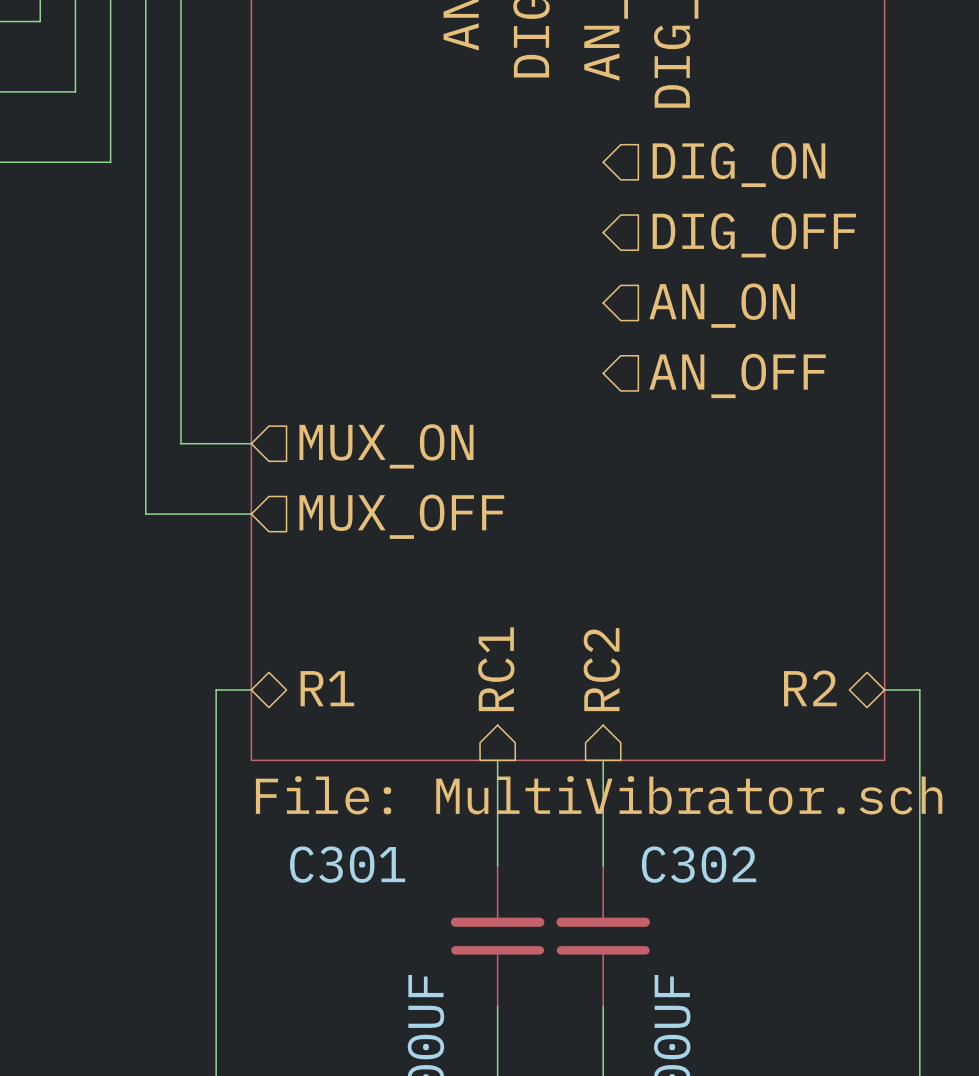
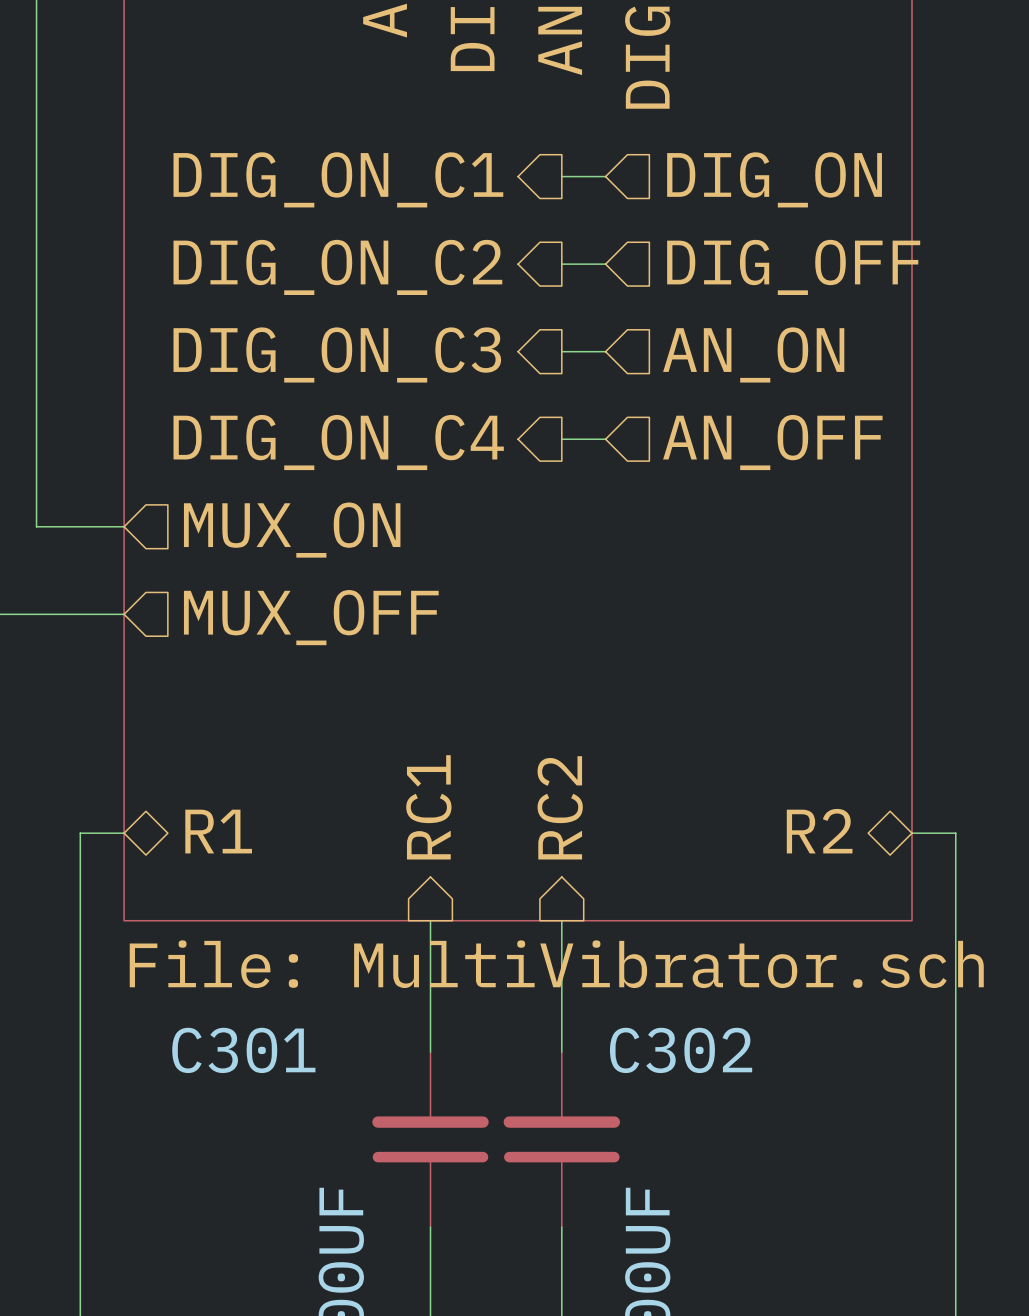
wire: none -> (561, 176) (605, 176)
hierarchical label: none -> DIG_ON_C1 (338, 179)
hierarchical label position: DIG_ON (738, 164) -> DIG_ON (774, 179)
wire: none -> (561, 264) (605, 264)
hierarchical label: none -> DIG_ON_C2 (337, 267)
hierarchical label position: DIG_OFF (754, 235) -> DIG_OFF (793, 267)
wire: none -> (561, 351) (605, 351)
hierarchical label: none -> DIG_ON_C3 (337, 354)
hierarchical label position: AN_ON (722, 305) -> AN_ON (753, 354)
wire: none -> (561, 439) (605, 439)
hierarchical label: none -> DIG_ON_C4 (338, 442)
hierarchical label position: AN_OFF (737, 376) -> AN_OFF (772, 442)

